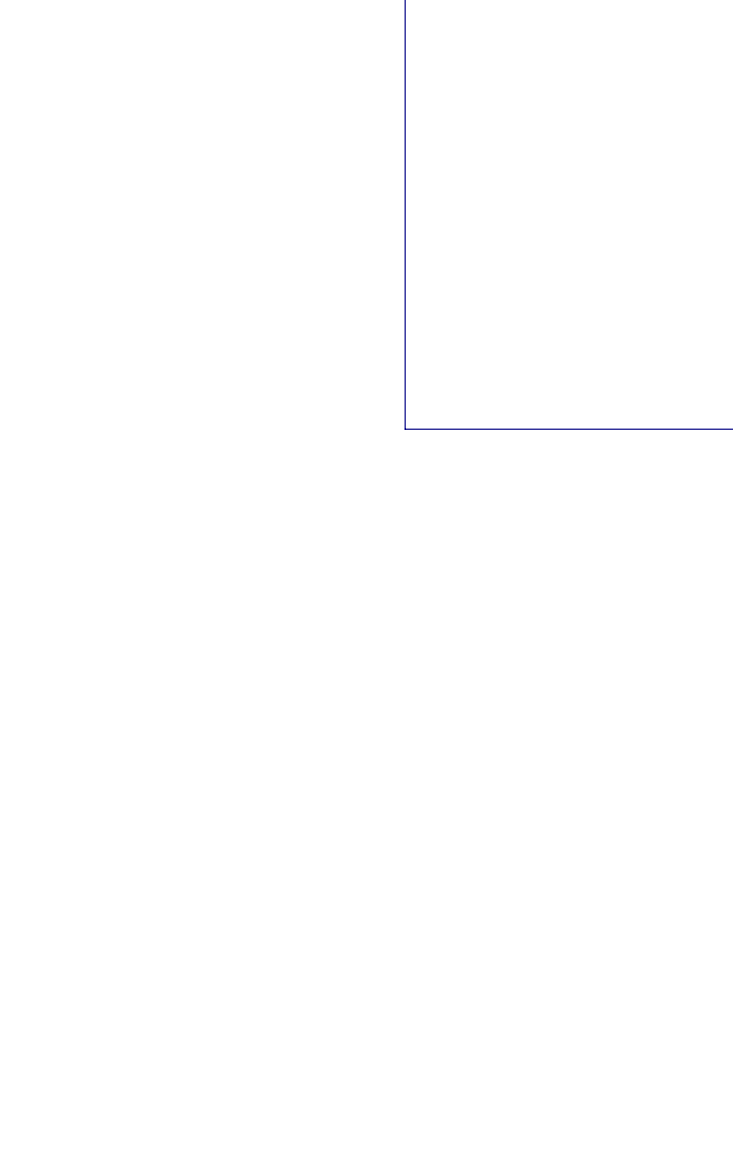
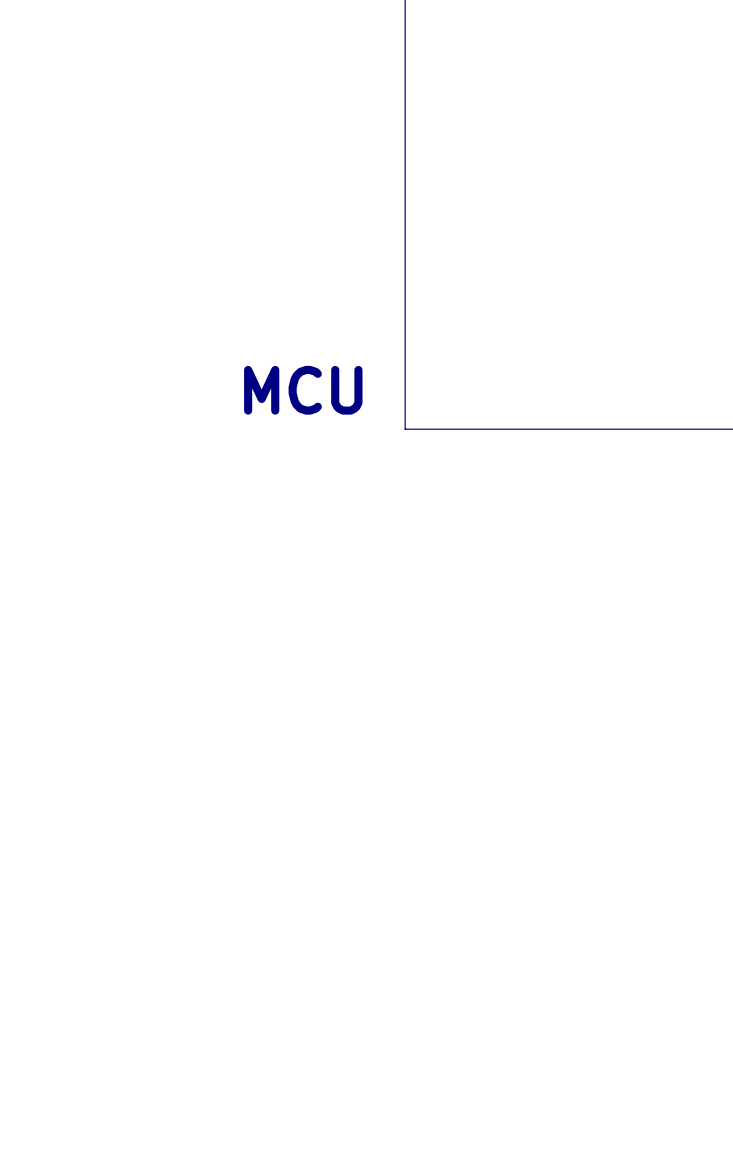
text: none -> MCU (303, 390)

